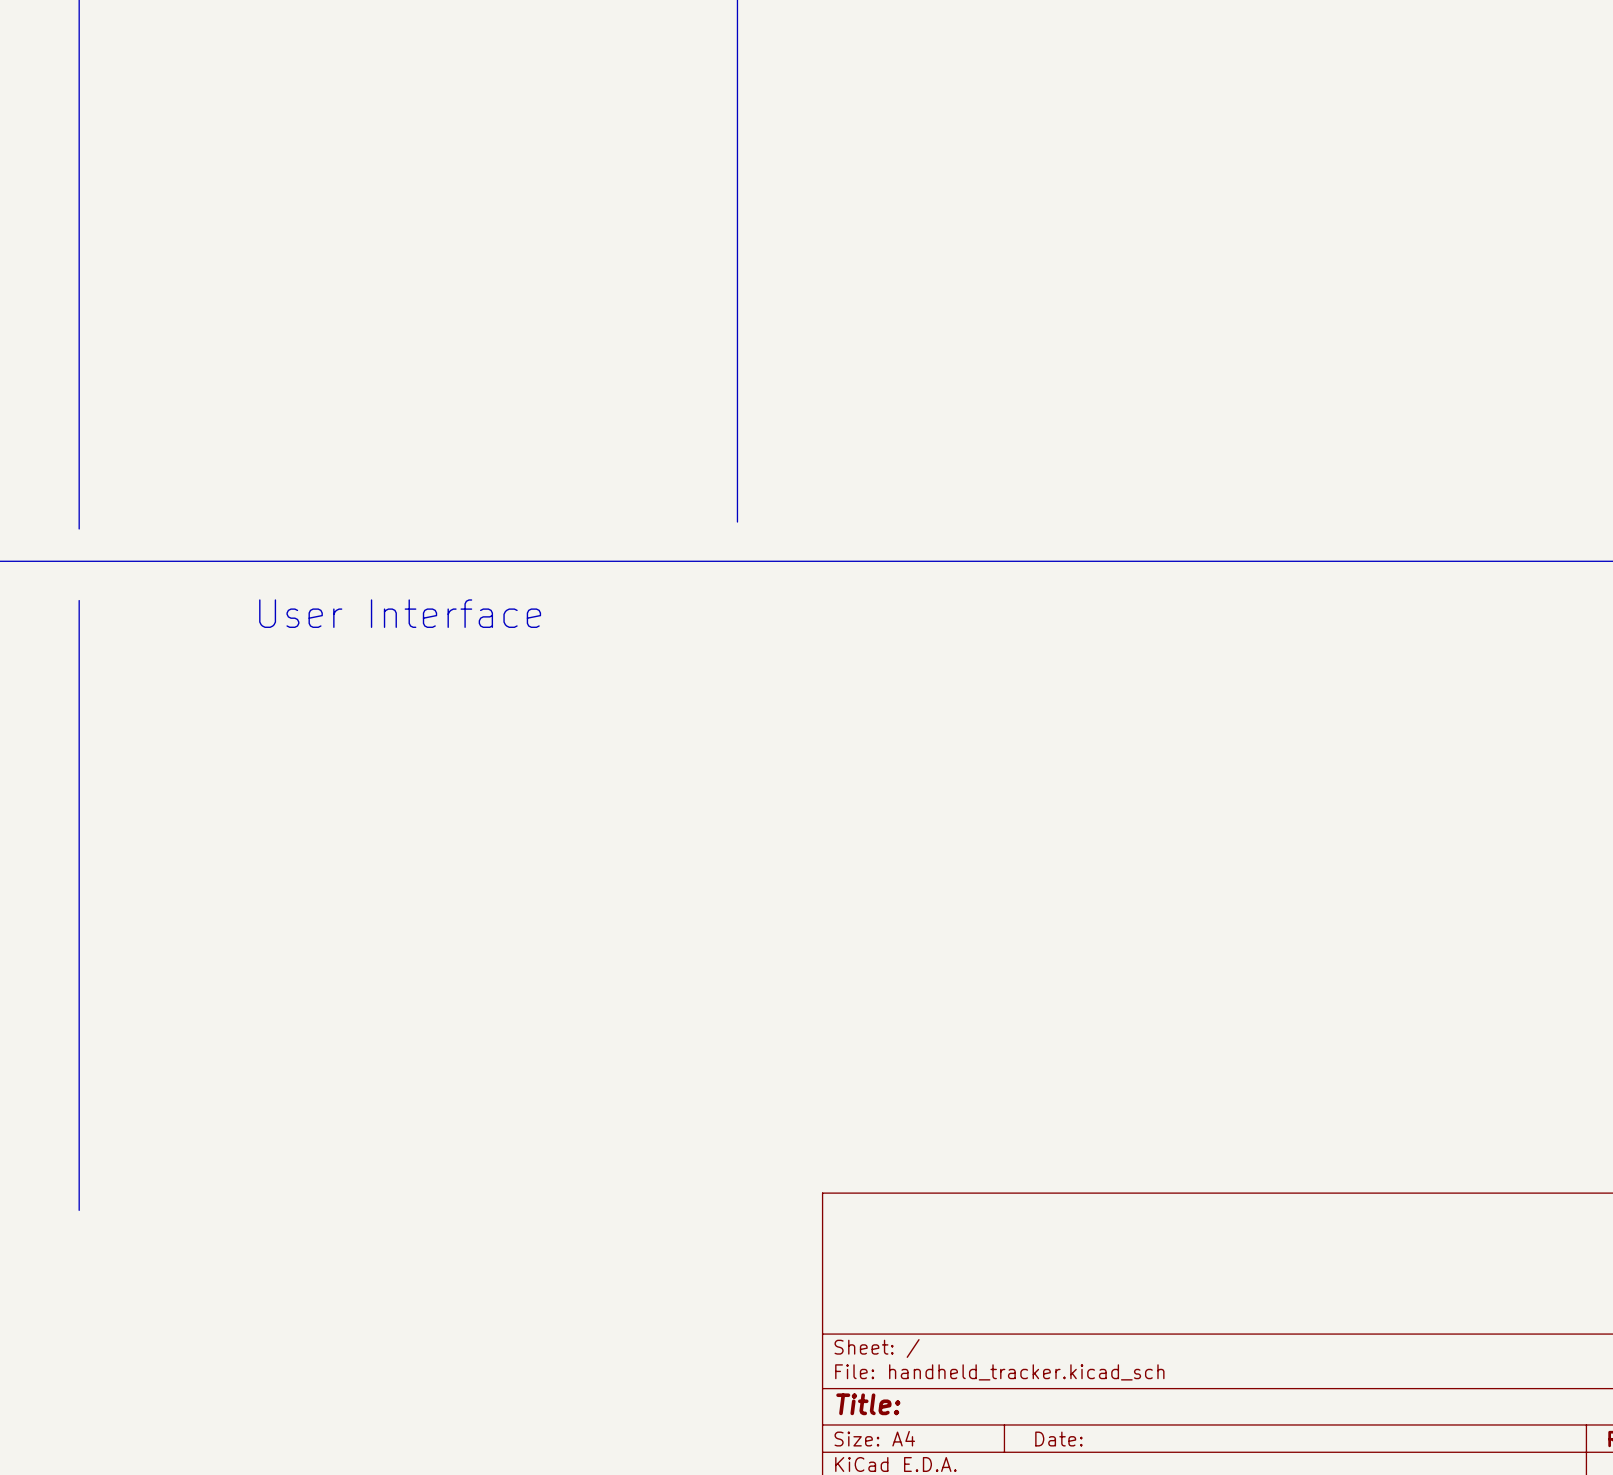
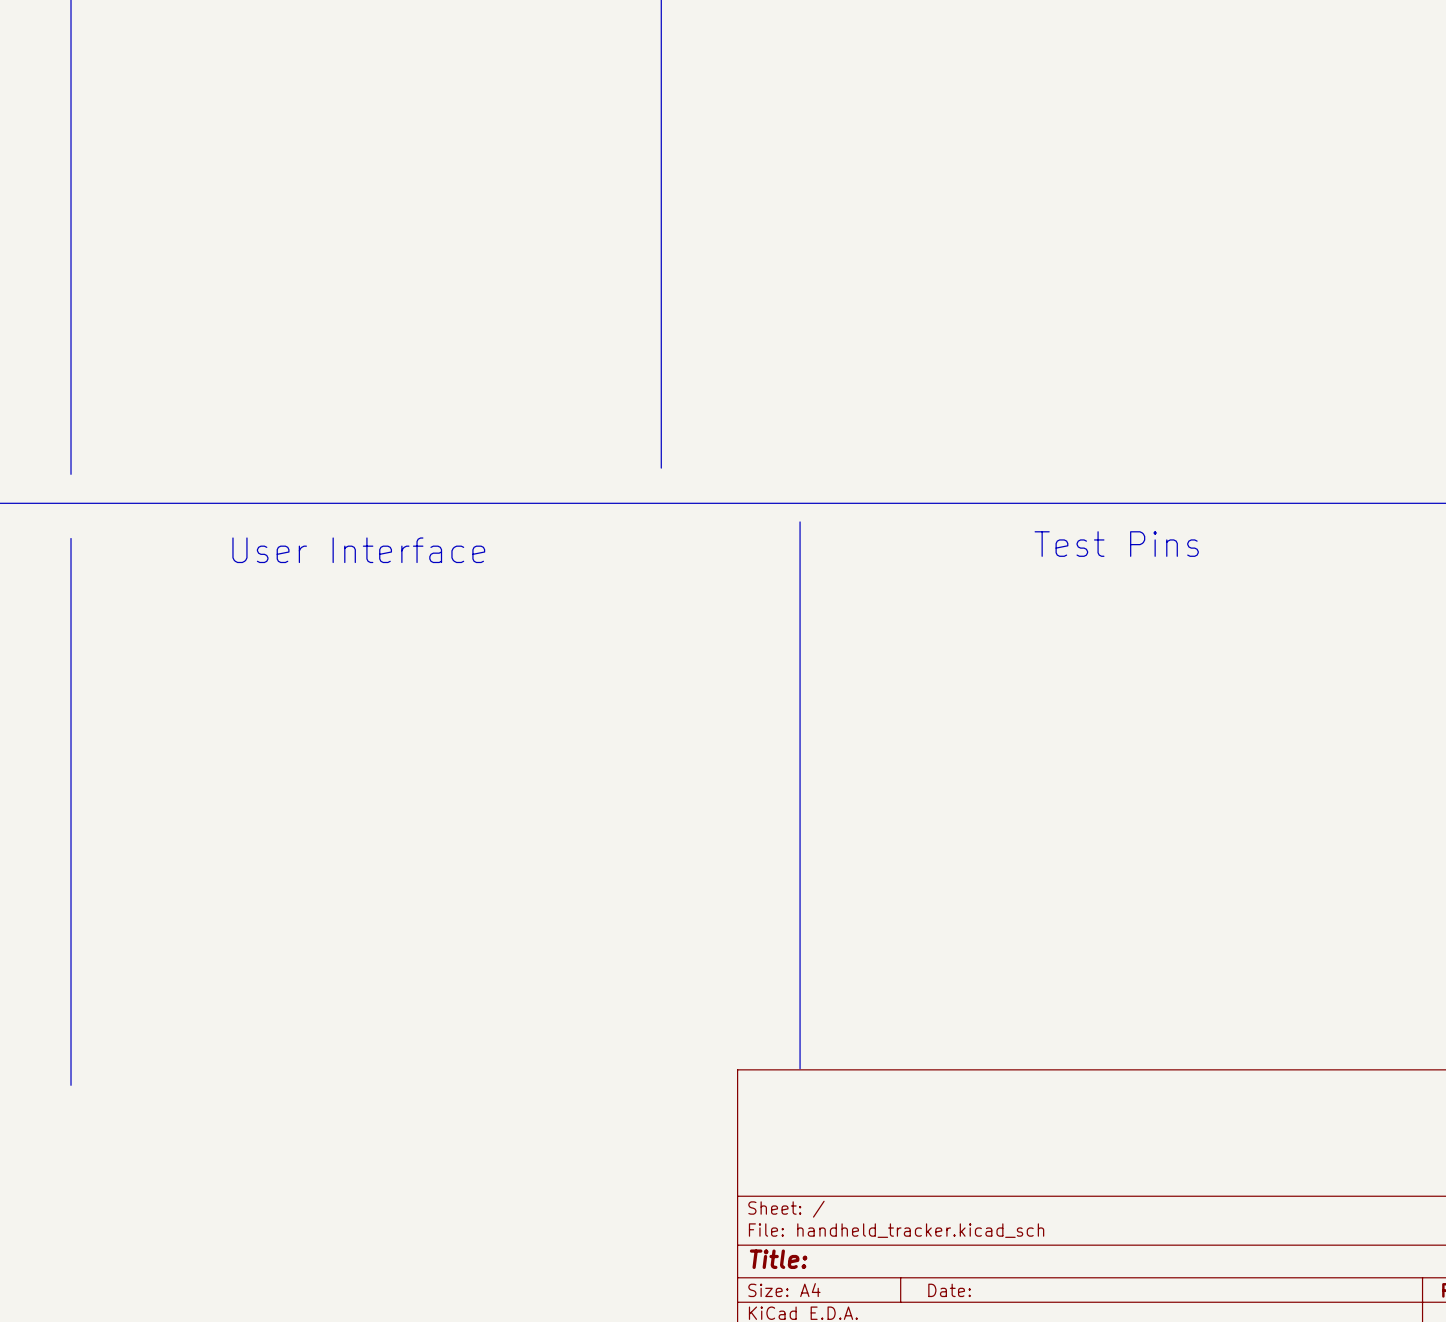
line: none -> (800, 521) (800, 1068)
text: none -> Test Pins (1116, 544)

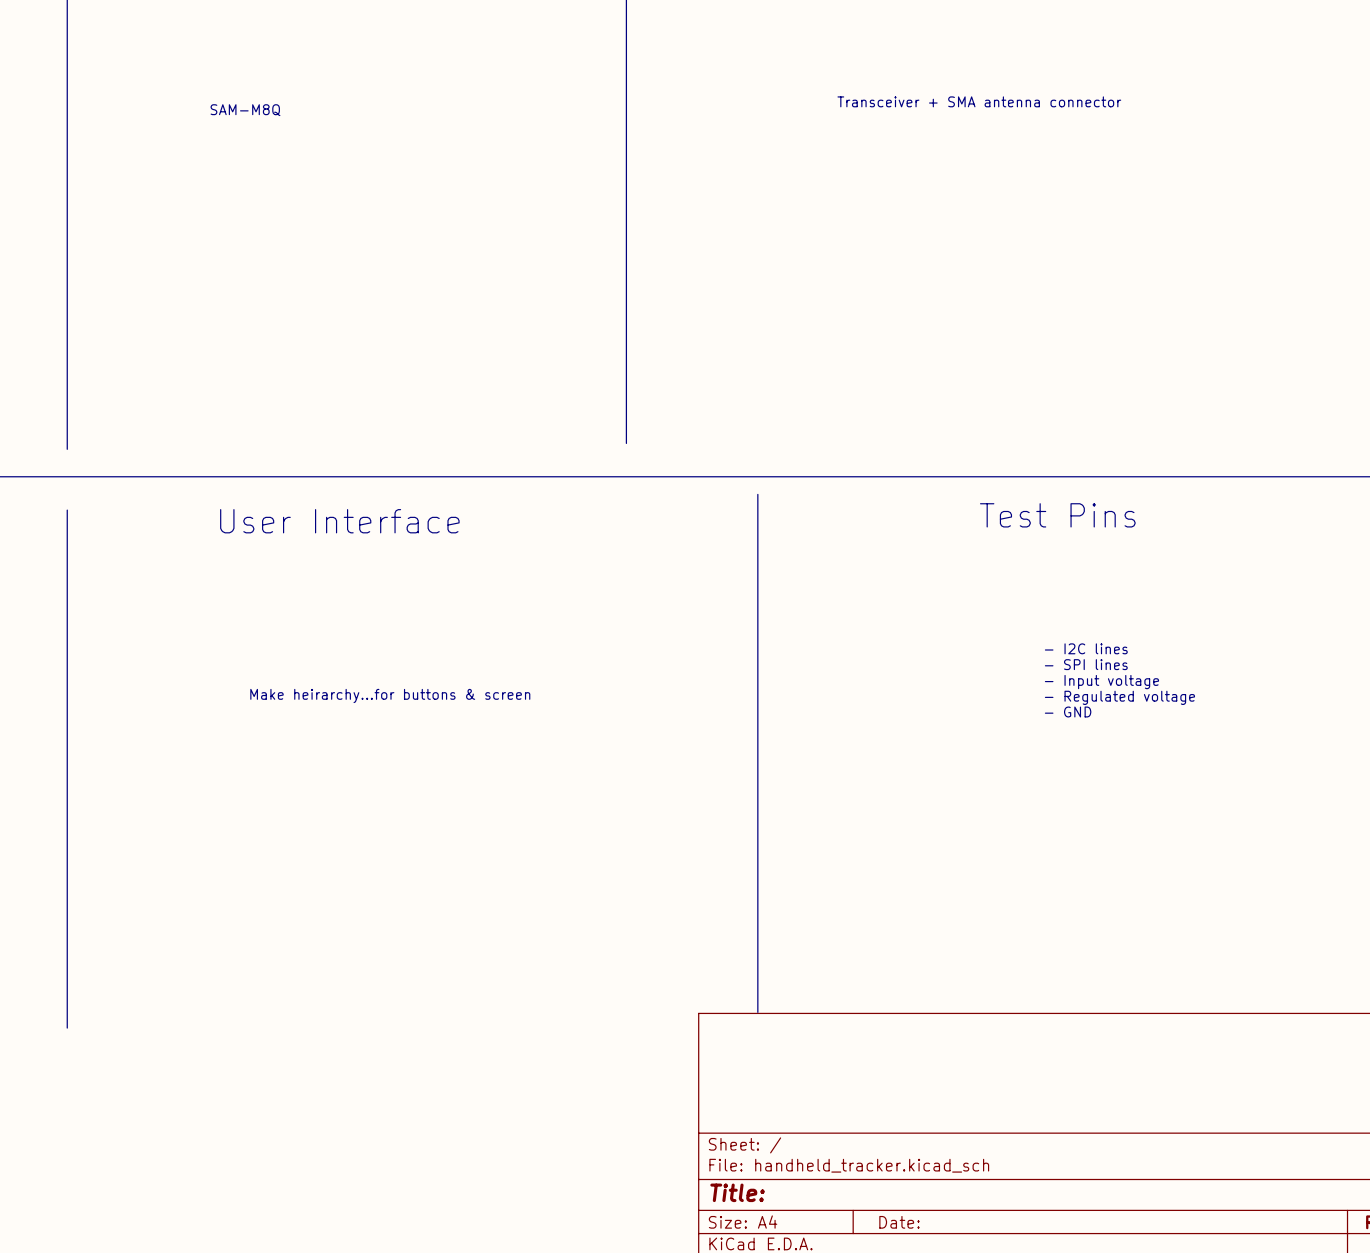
text: none -> Transceiver + SMA antenna connector (979, 101)
text: none -> SAM-M8Q (245, 110)
text: none -> - I2C lines (1086, 648)
text: none -> - SPI lines (1086, 664)
text: none -> - Input voltage (1101, 682)
text: none -> Make heirarchy...for buttons & screen (390, 695)
text: none -> - Regulated voltage (1119, 697)
text: none -> - GND (1068, 712)

